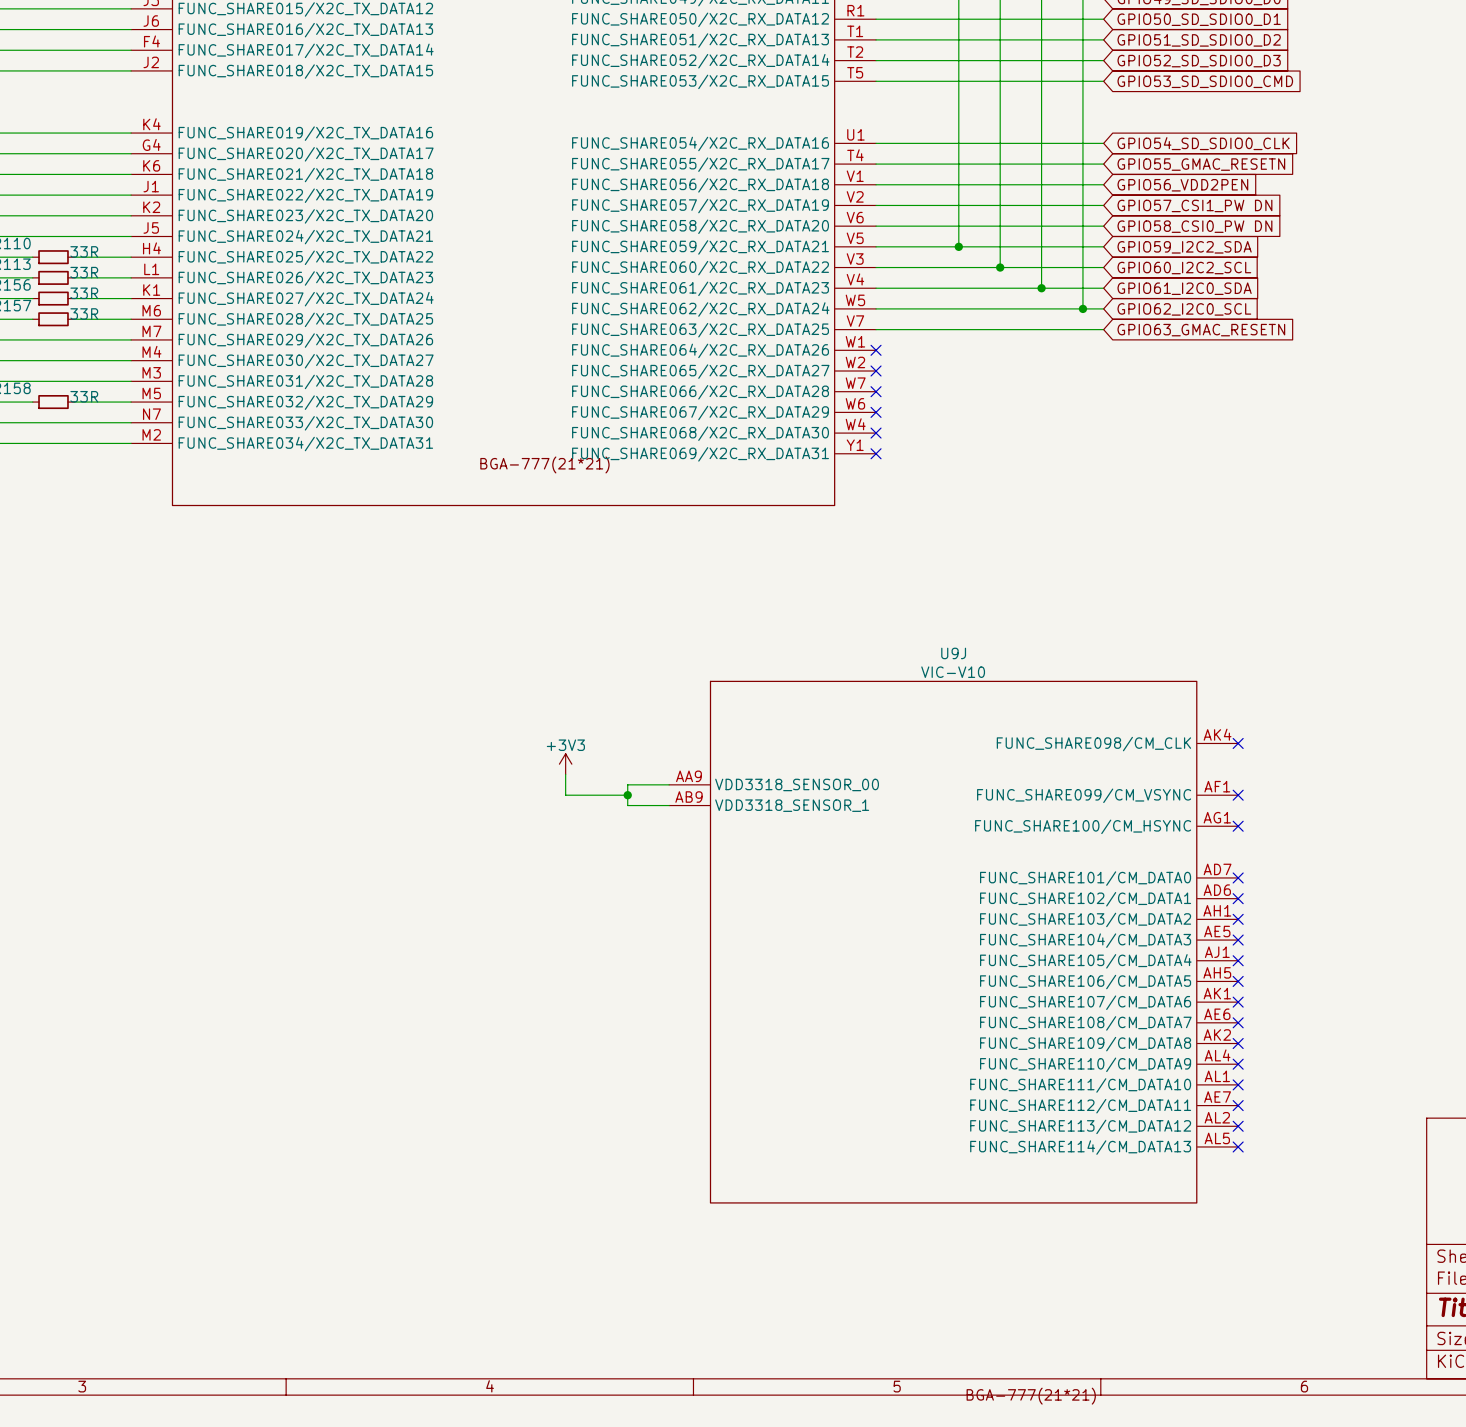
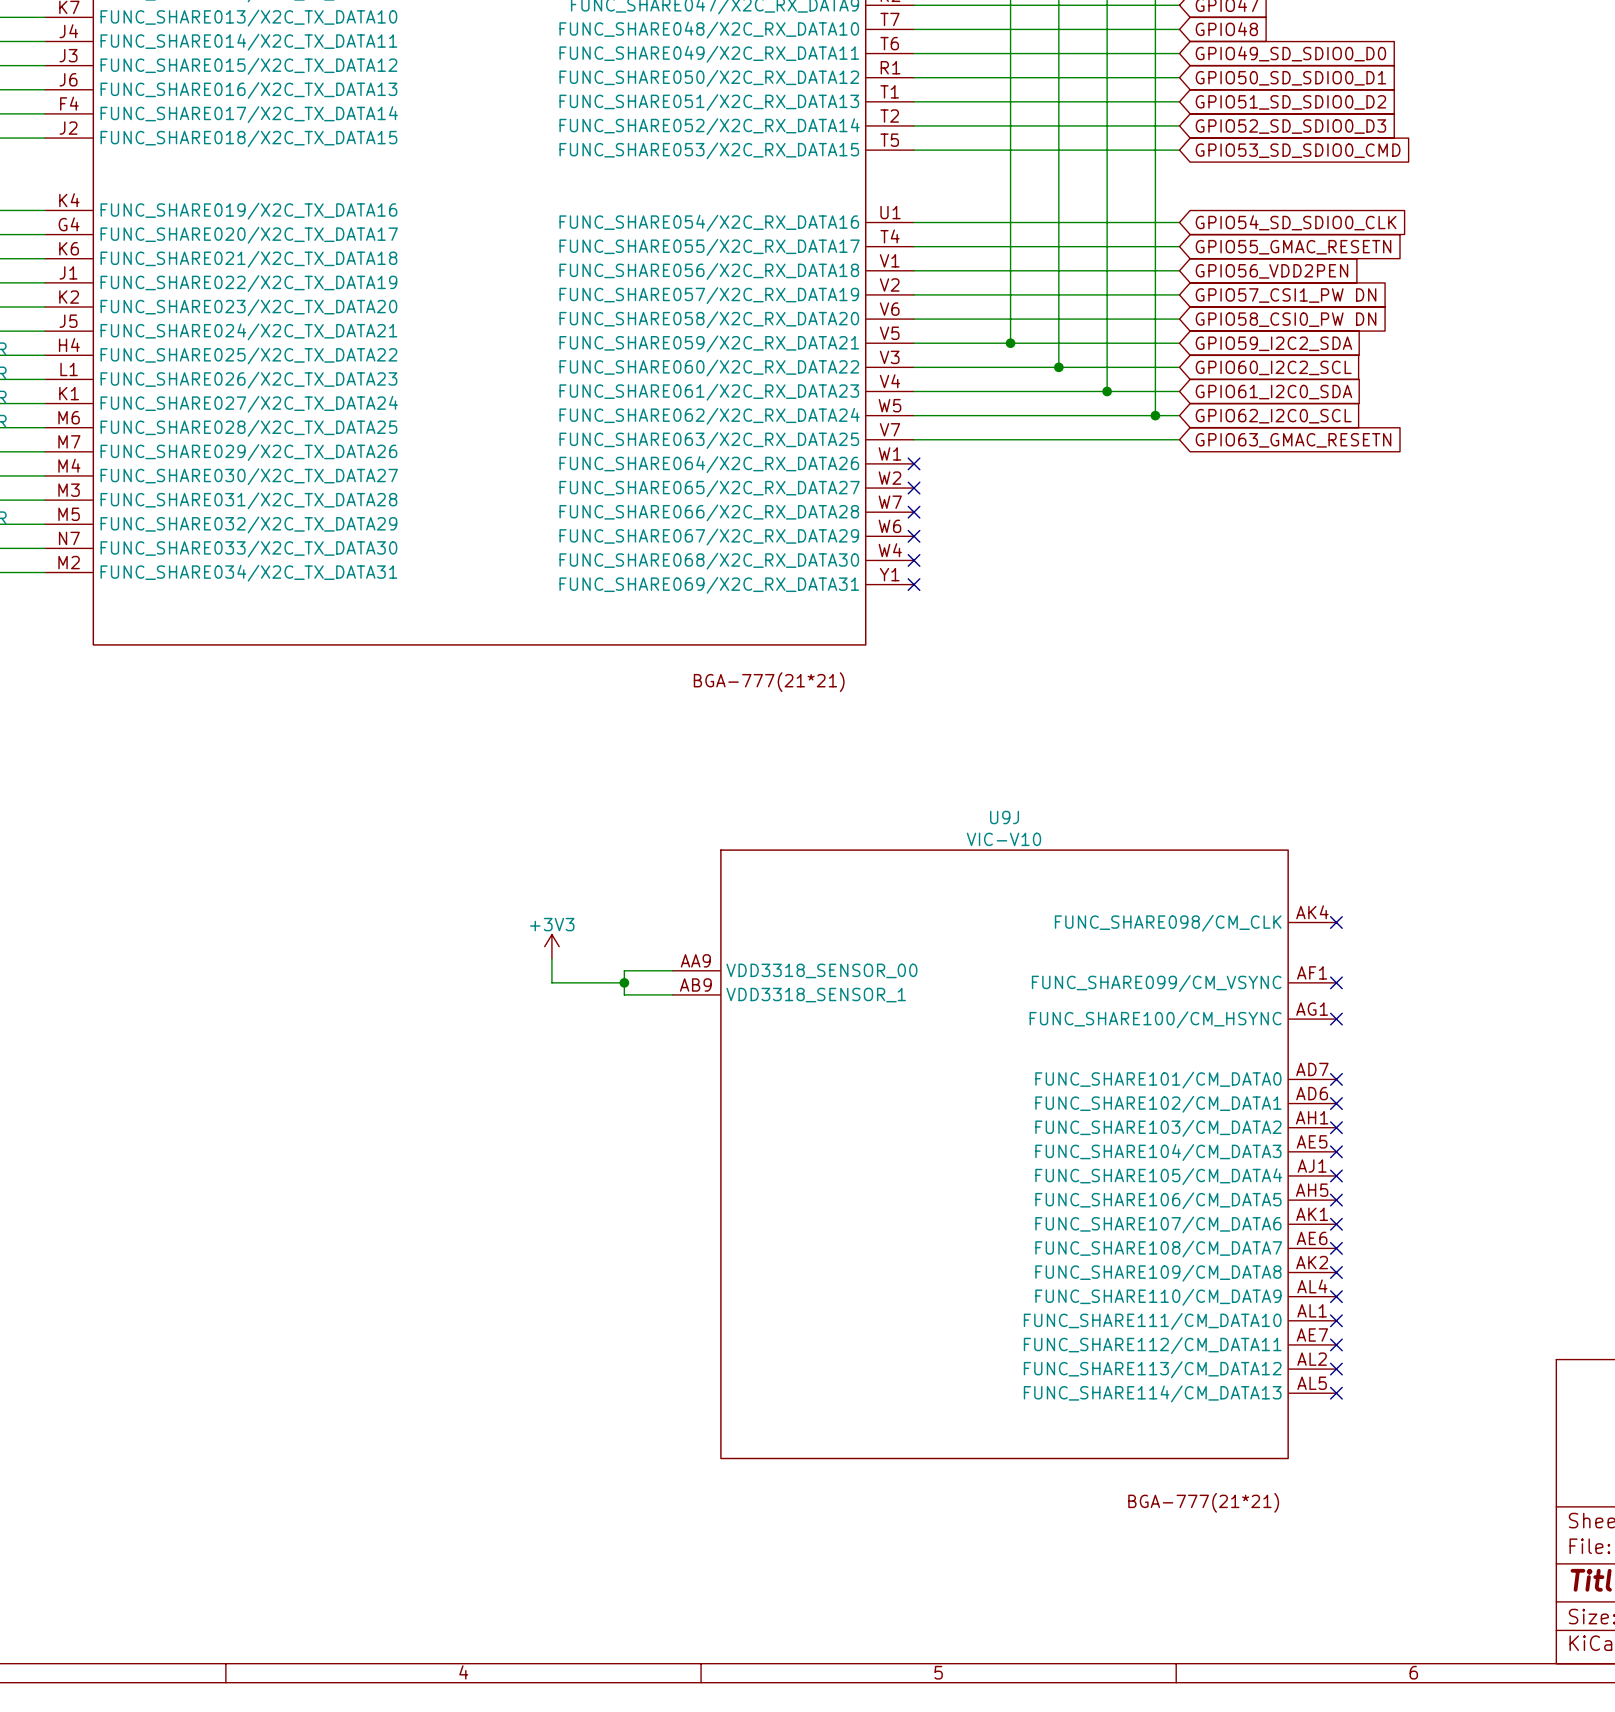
part text position: BGA-777(21*21) (544, 464) -> BGA-777(21*21) (769, 682)
U9J text position: BGA-777(21*21) (1031, 1396) -> BGA-777(21*21) (1203, 1502)

